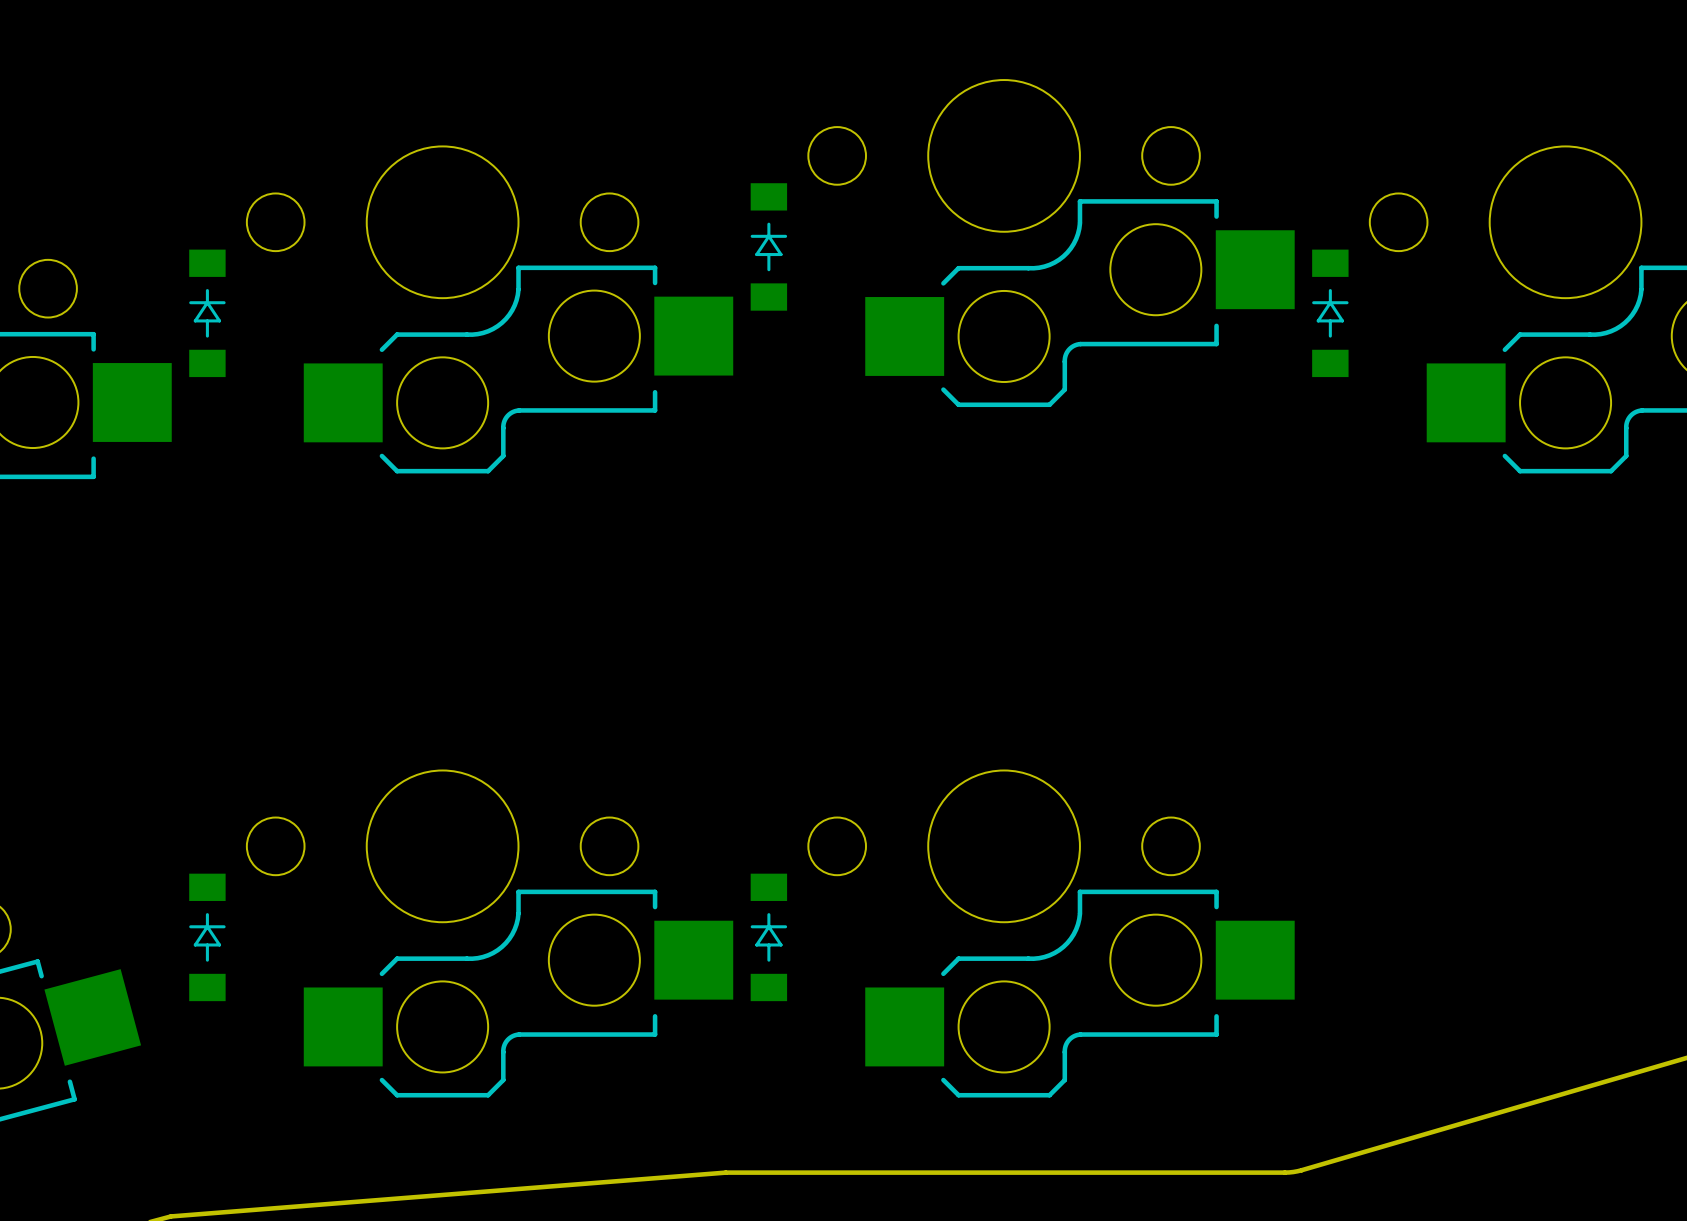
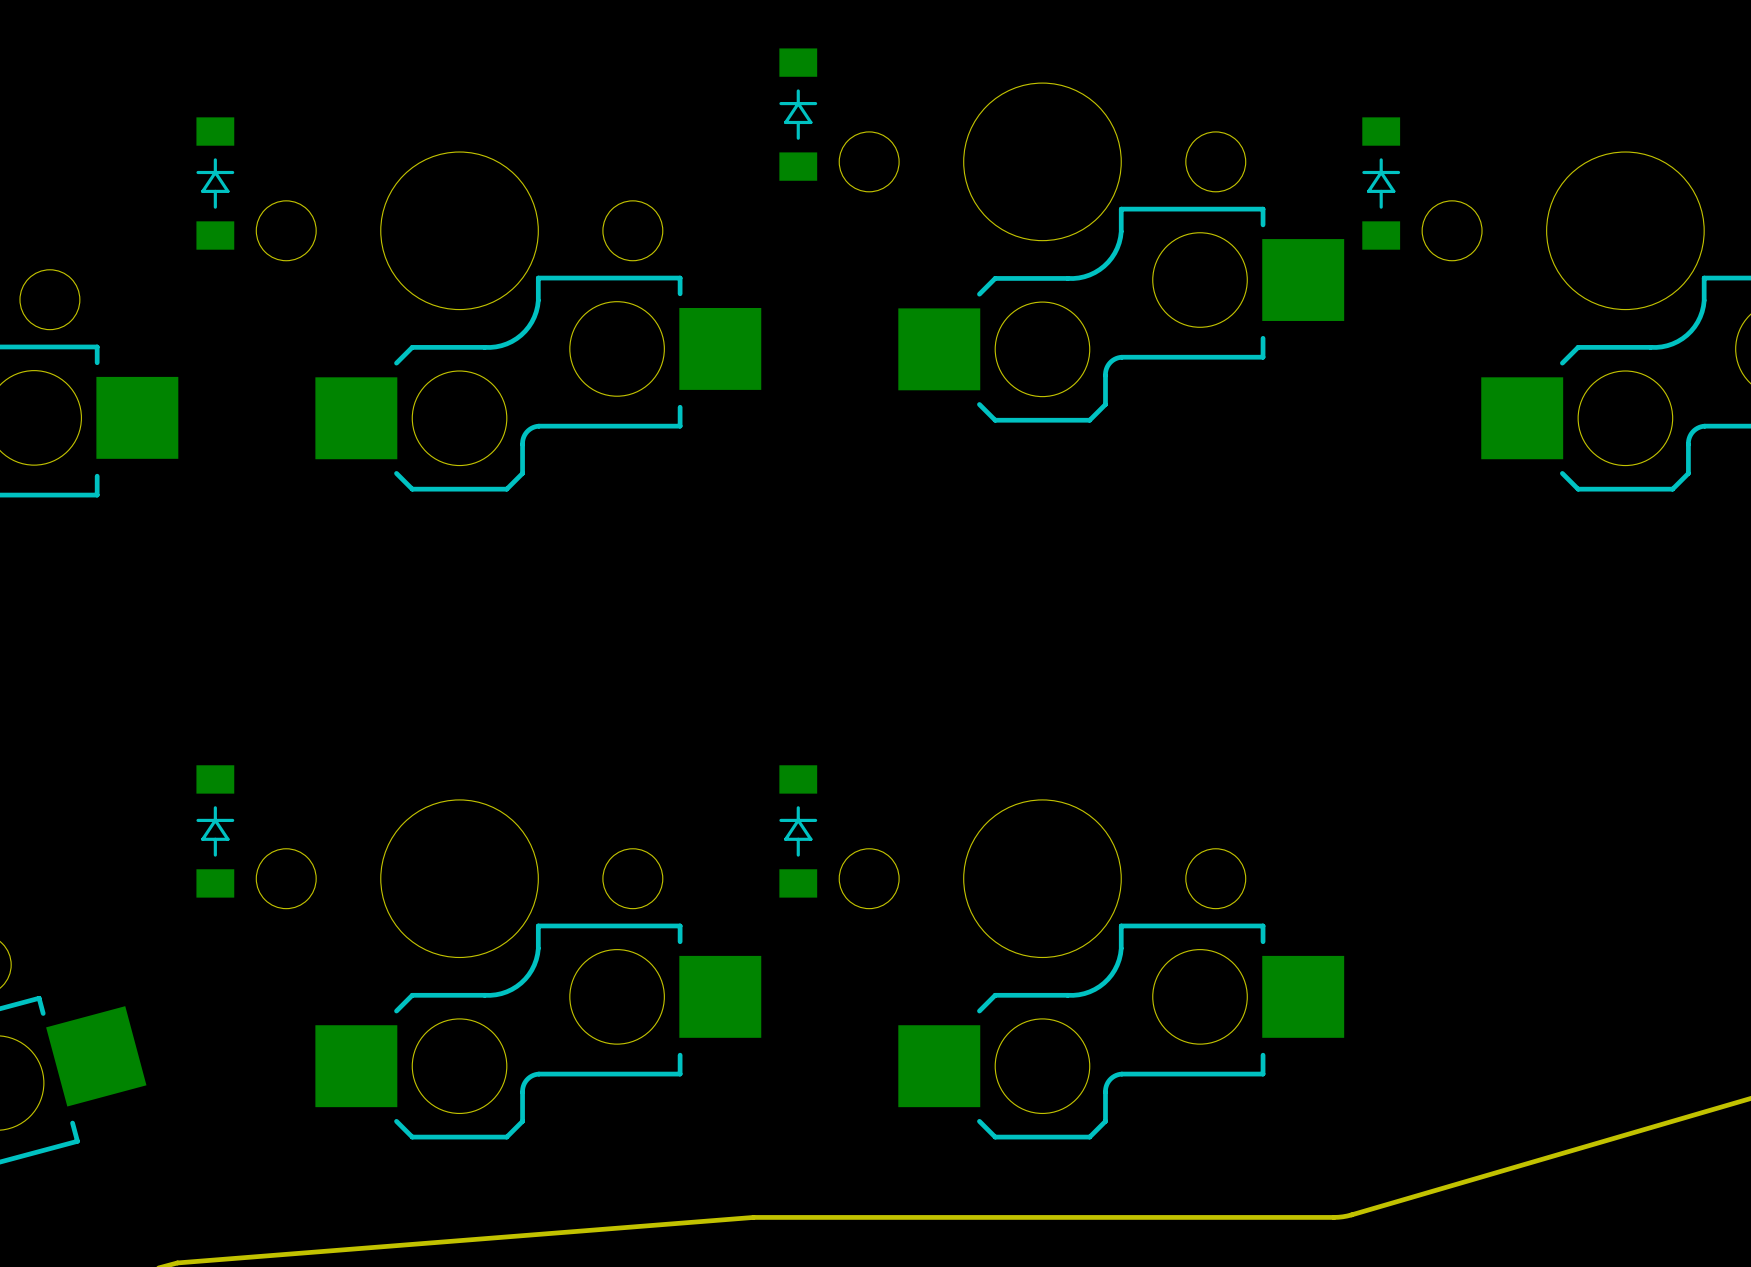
part position: (768, 246) -> (798, 114)
part position: (207, 313) -> (215, 183)
part position: (1330, 313) -> (1381, 183)
part position: (207, 937) -> (215, 831)
part position: (768, 937) -> (798, 831)

